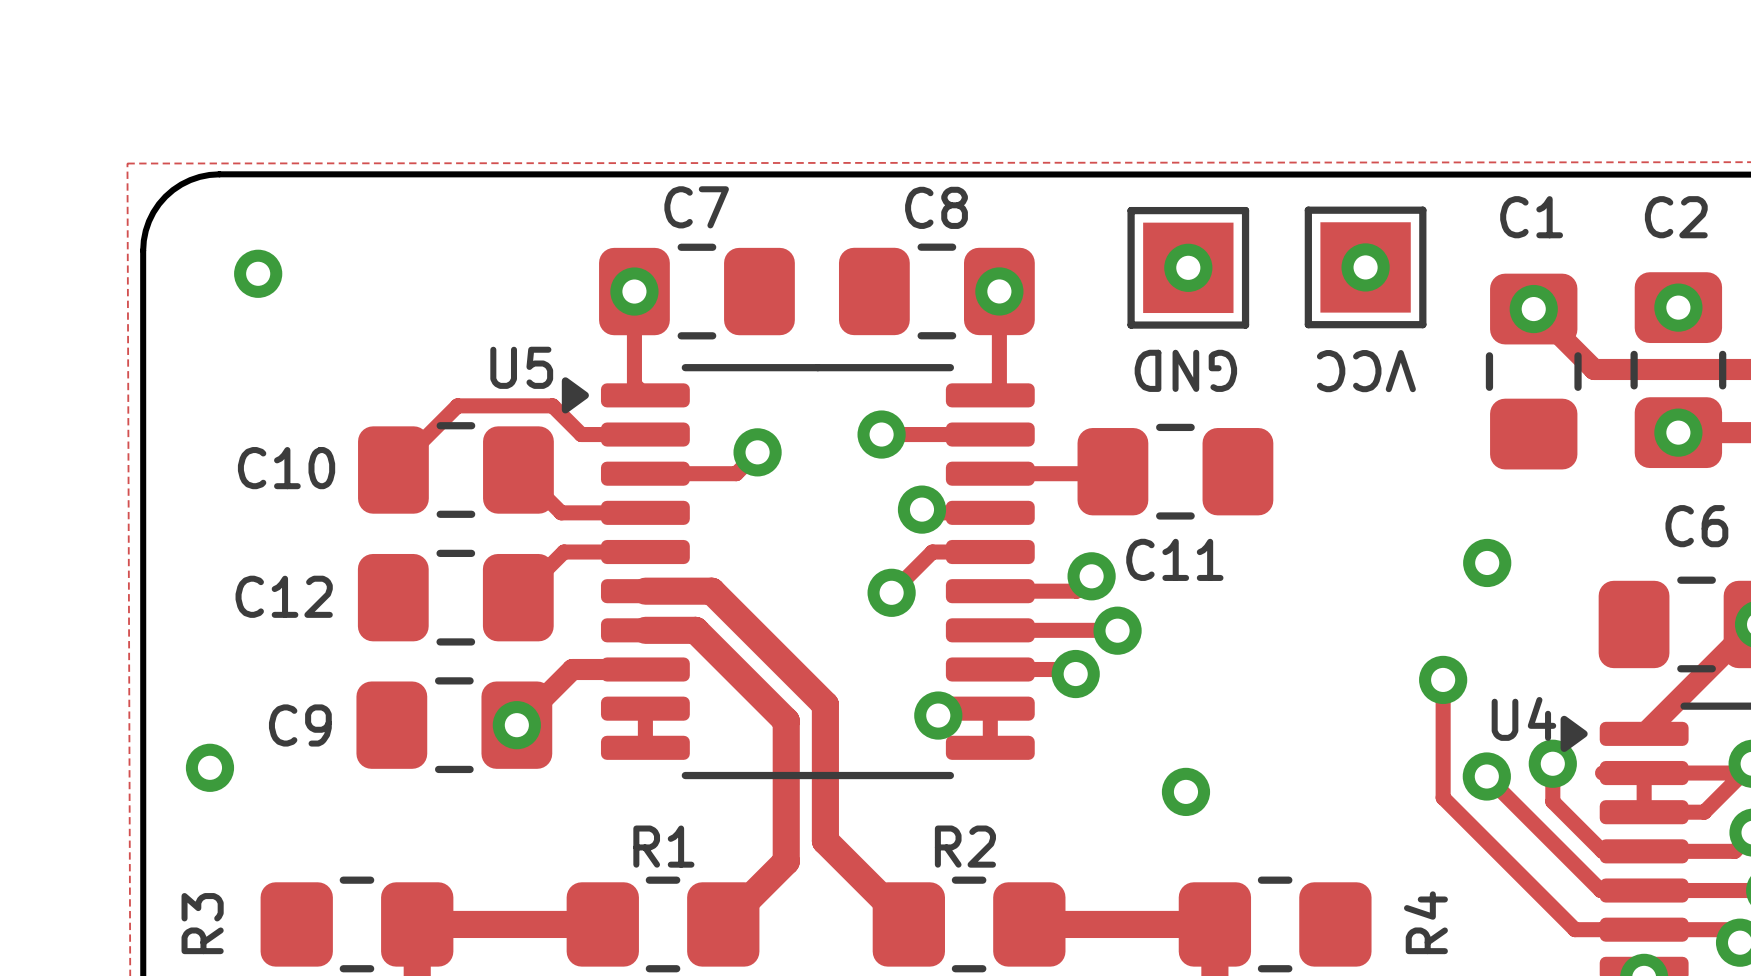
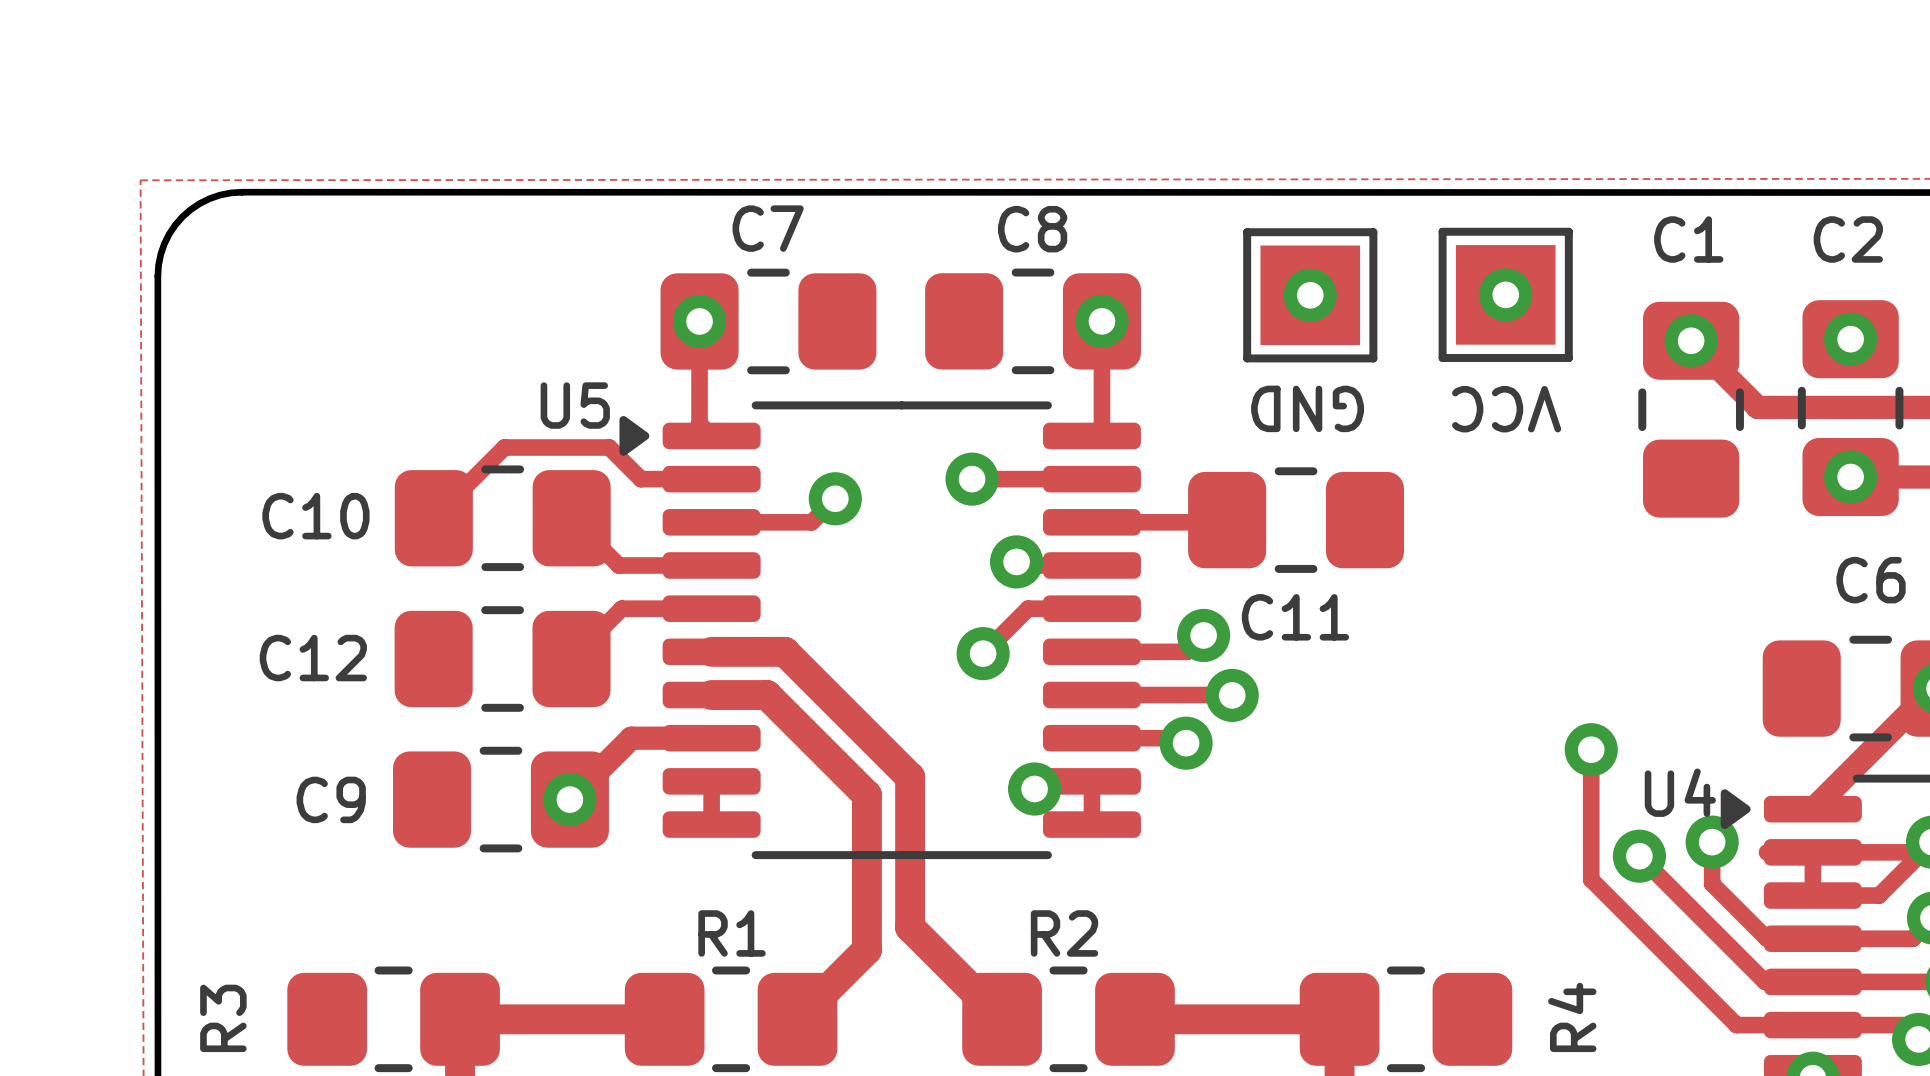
via: (258, 273) -> none
via: (1487, 562) -> none
via: (209, 767) -> none
via: (1185, 791) -> none

